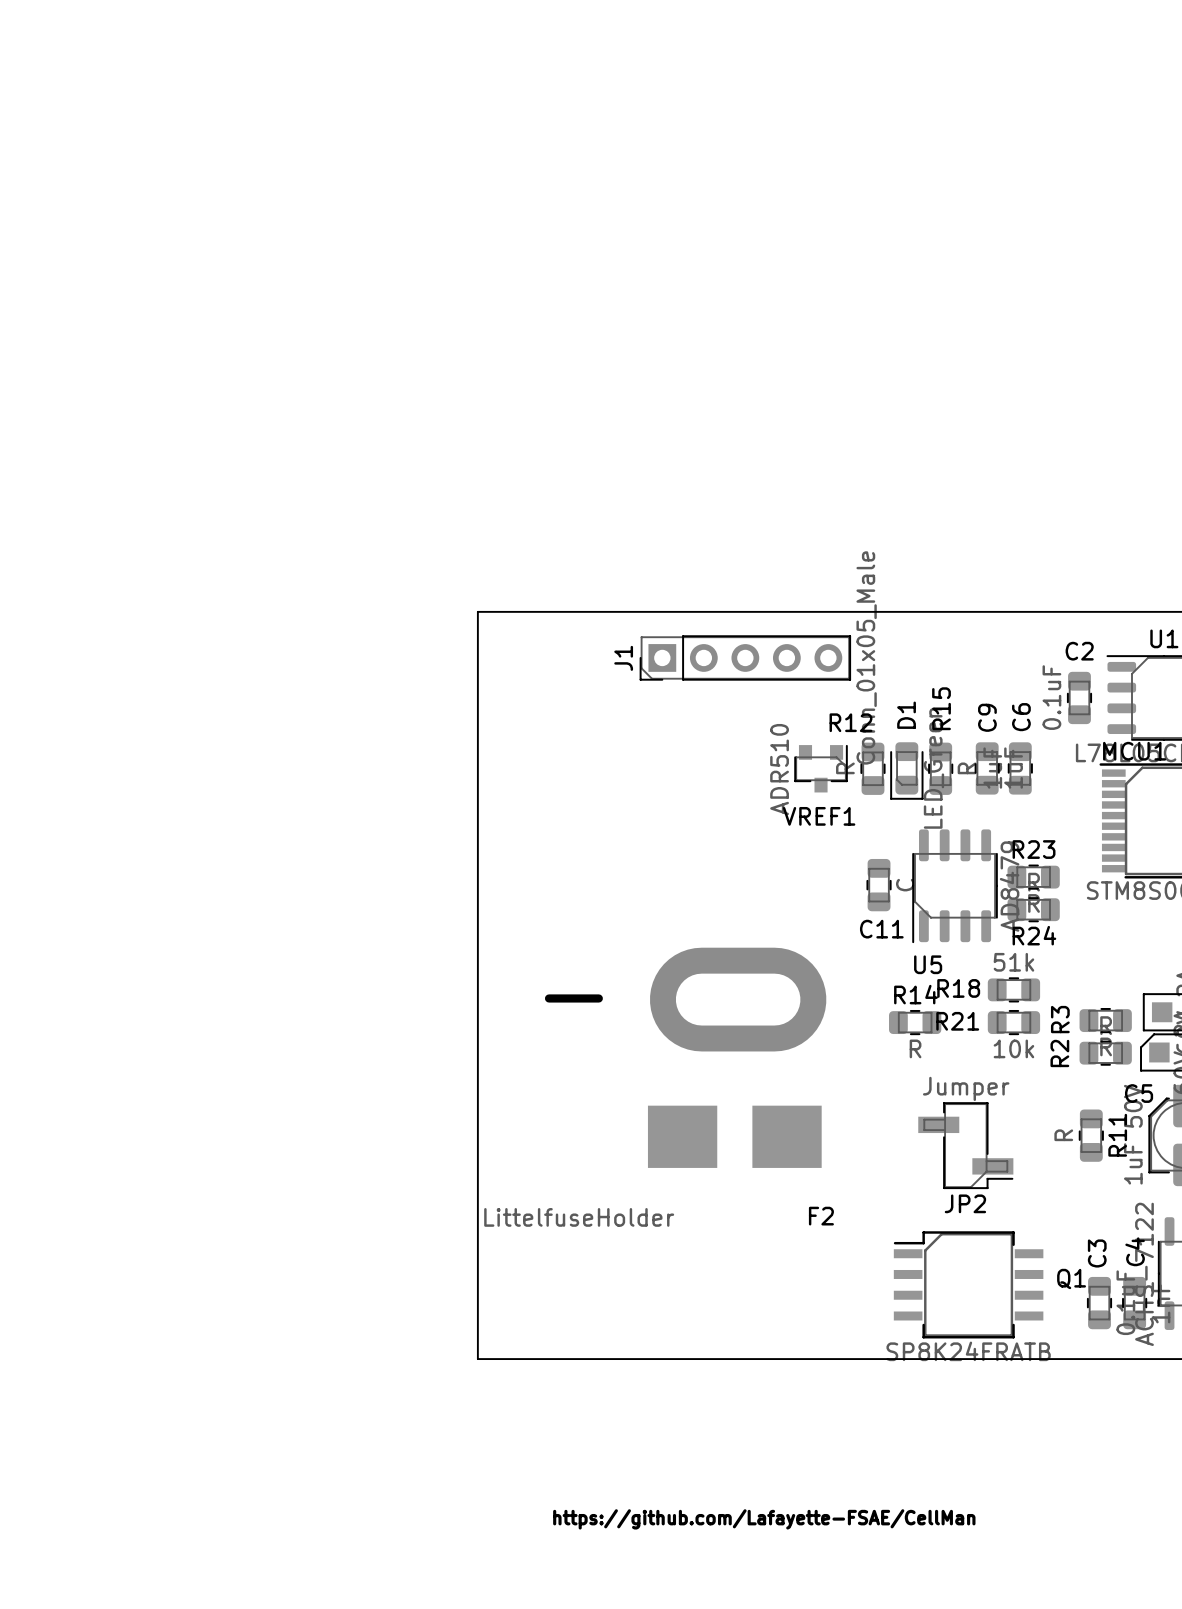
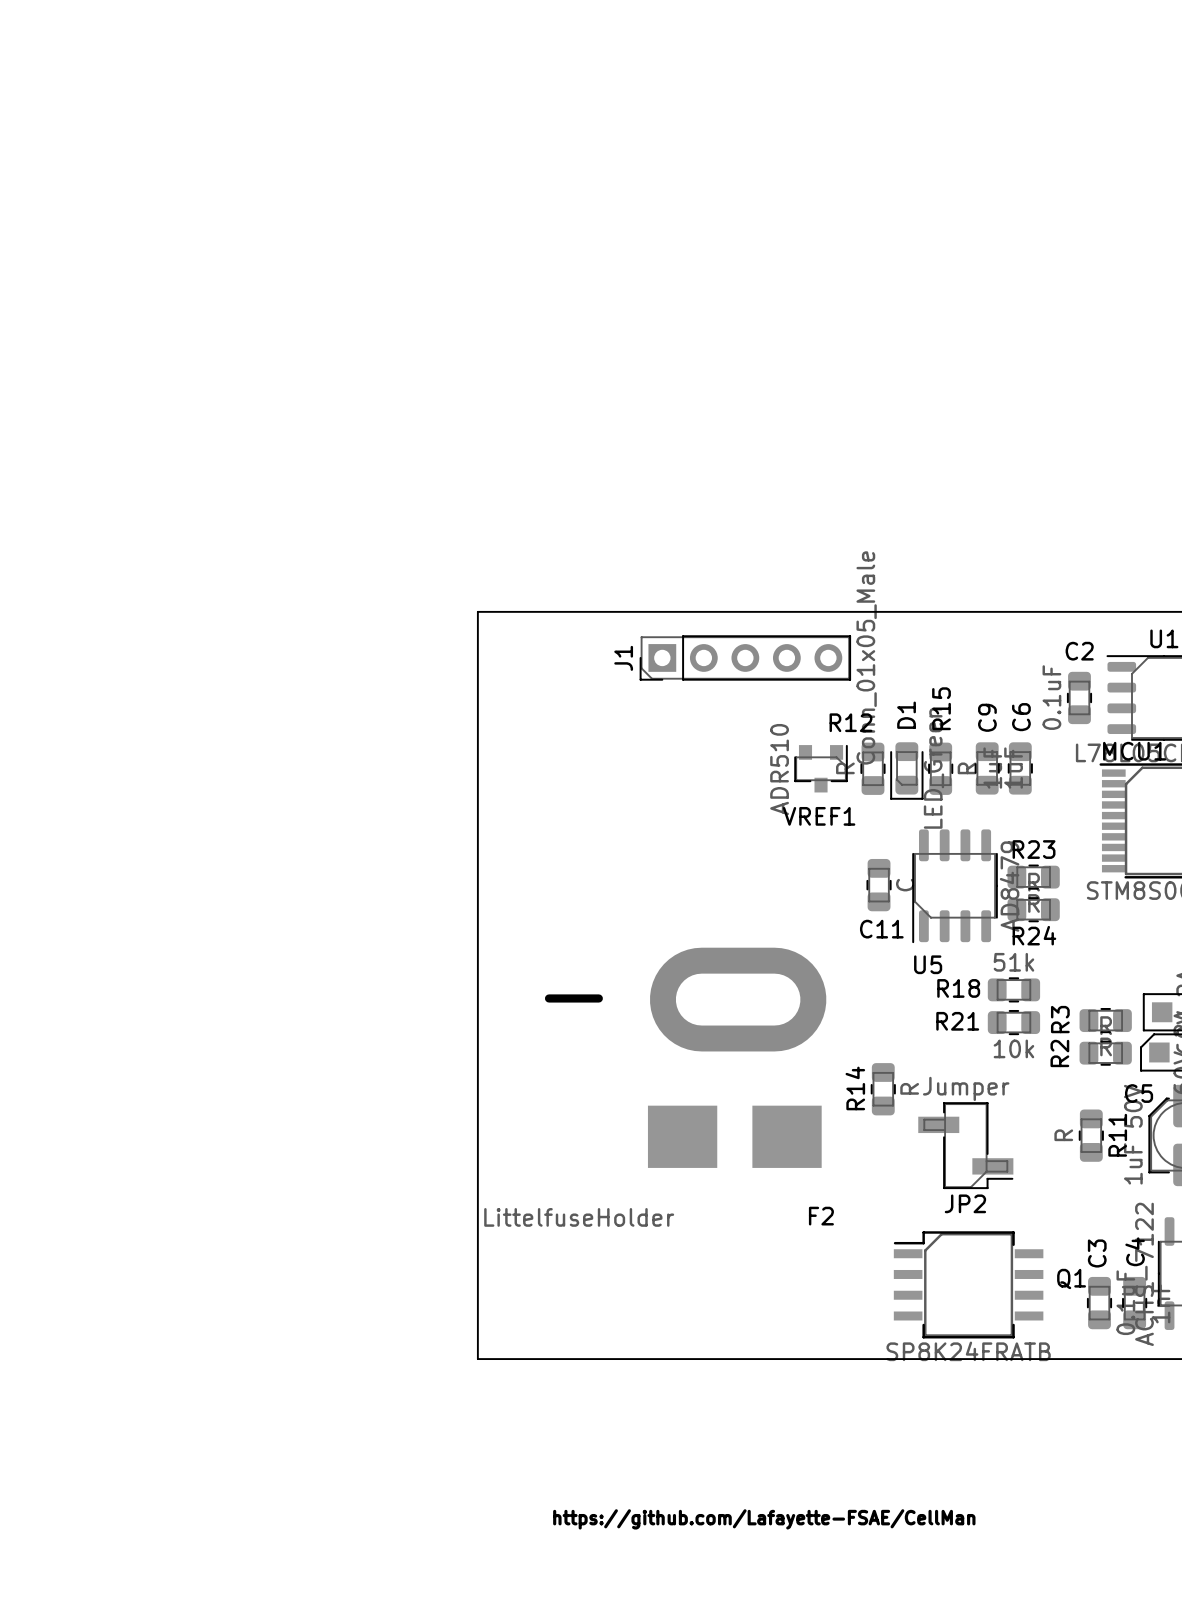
R14 name position: R14 (915, 994) -> R14 (855, 1088)
R14 rotation: 0° (915, 1022) -> 90° clockwise (883, 1089)
R14 position: (915, 1022) -> (883, 1089)
R14 value position: R (915, 1048) -> R (909, 1088)

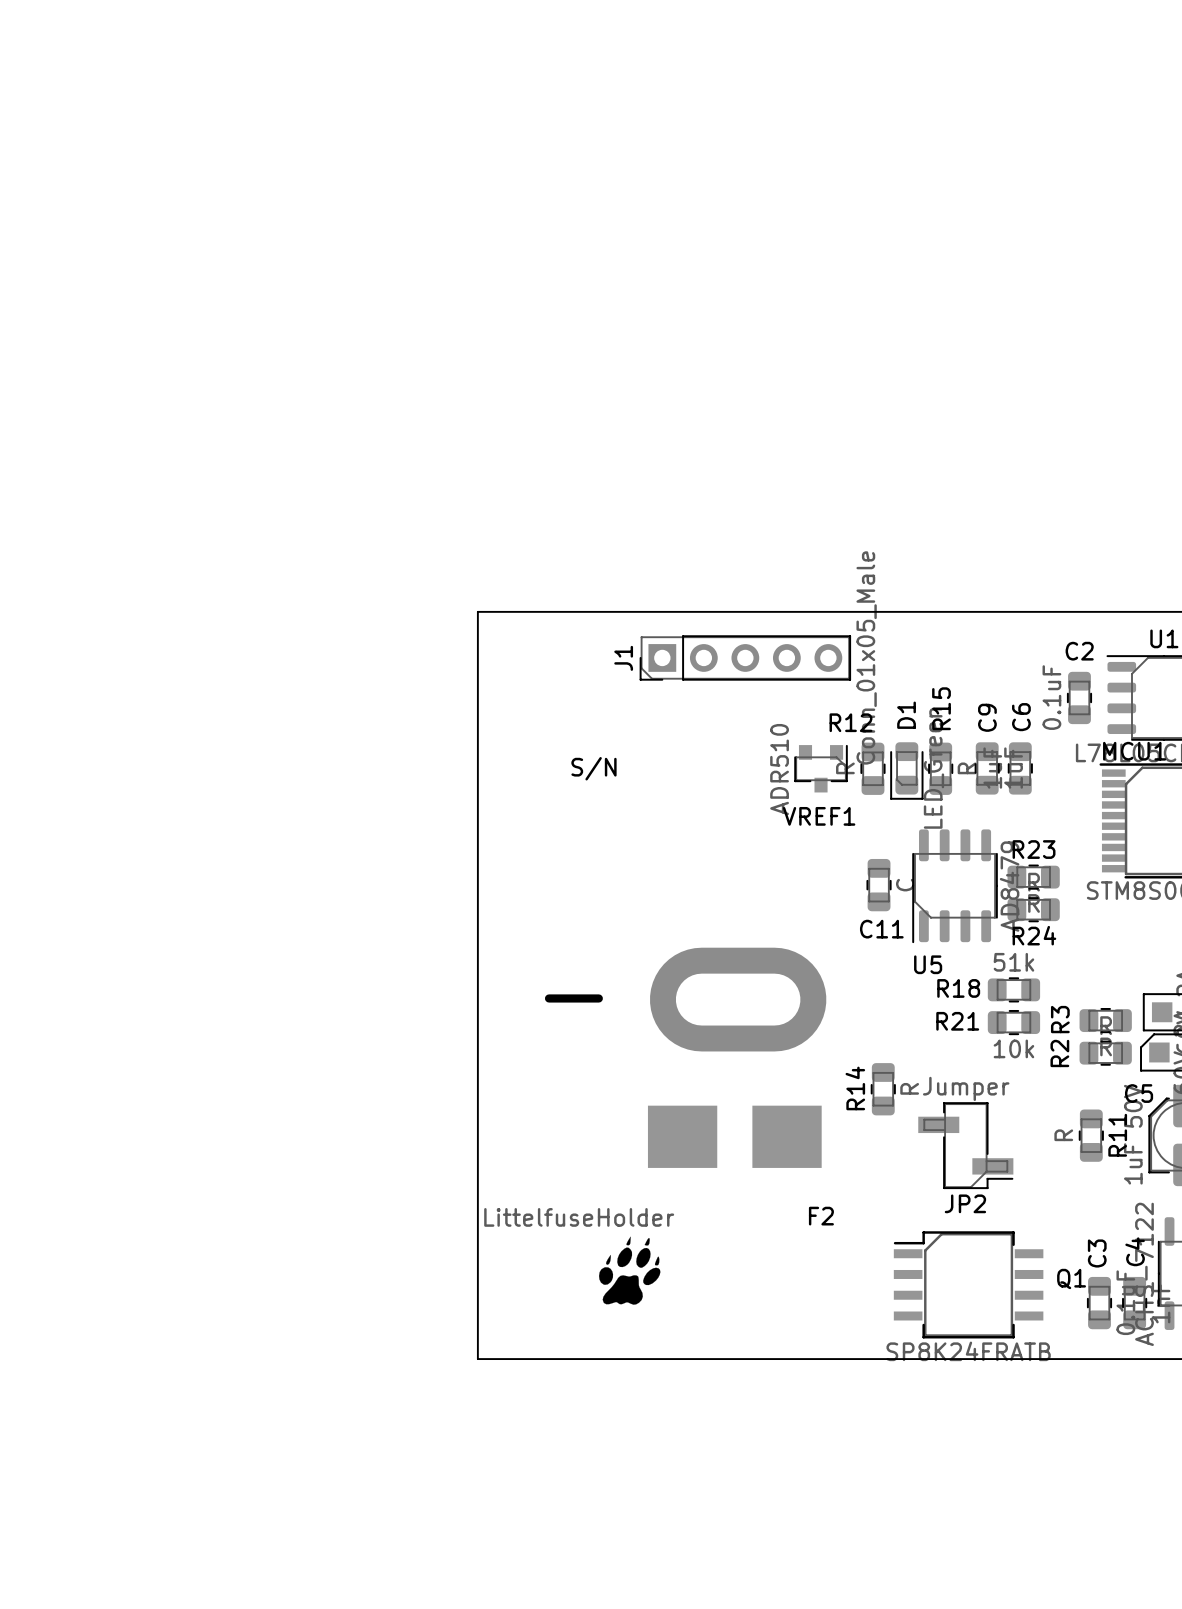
text: none -> S/N (593, 768)
drawing: none -> [599, 1236, 661, 1305]
text: https://github.com/Lafayette-FSAE/CellMan (764, 1519) -> none

